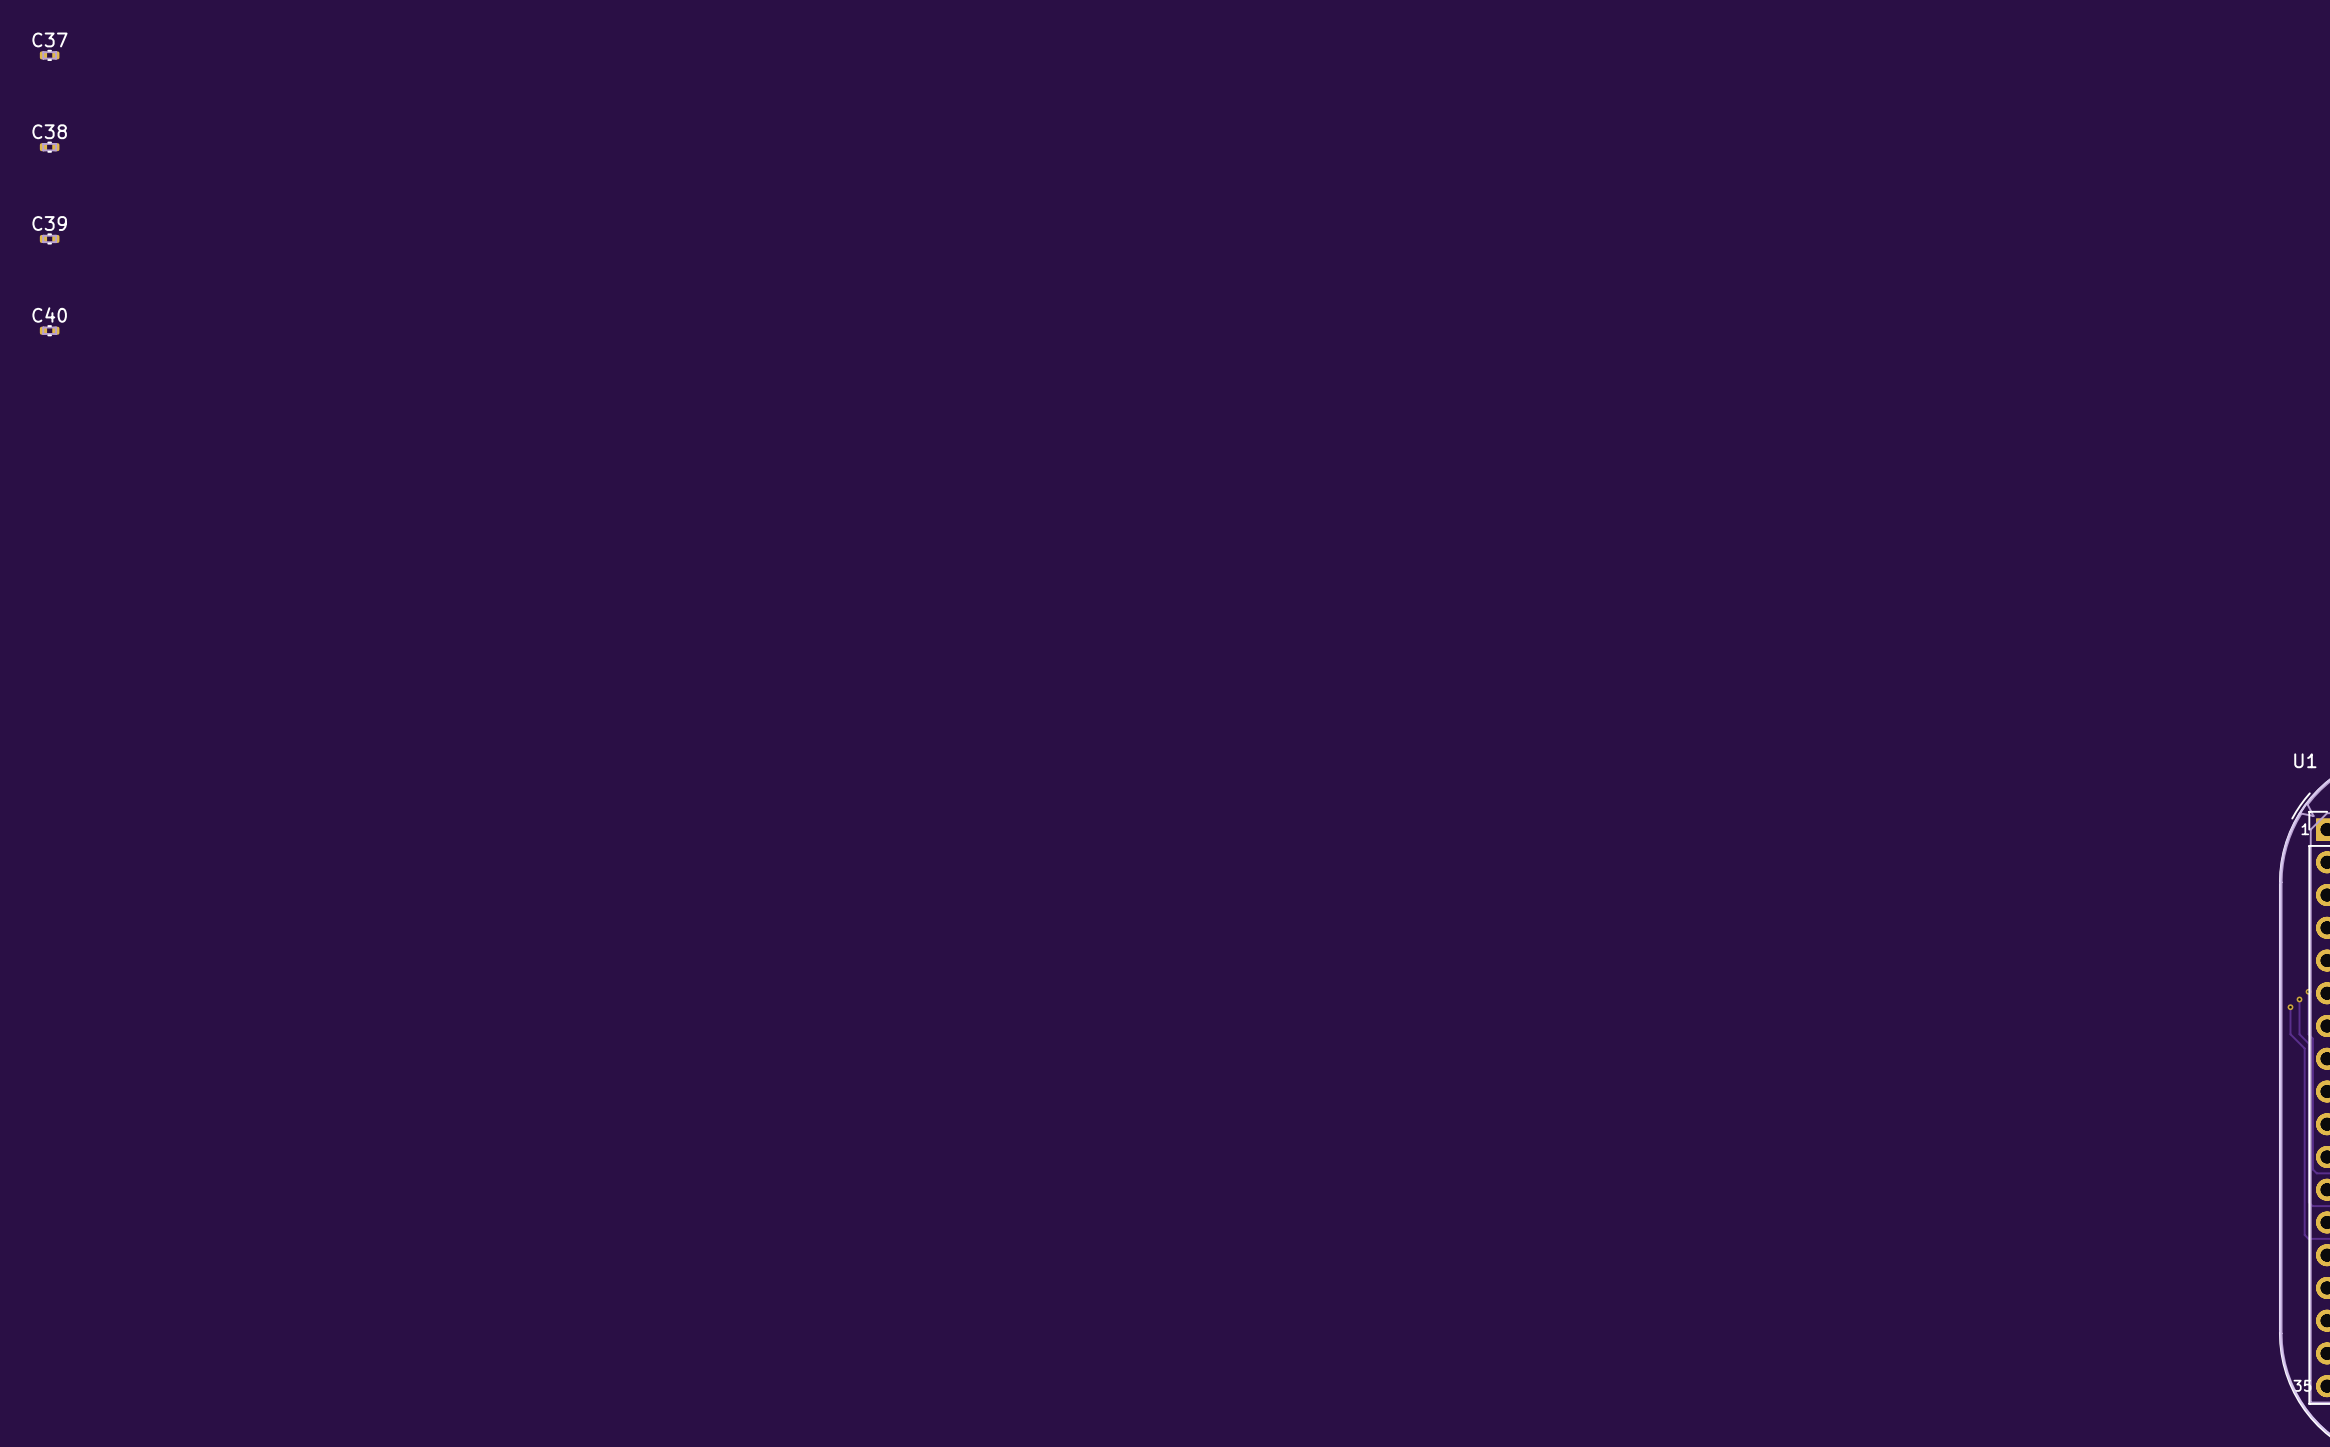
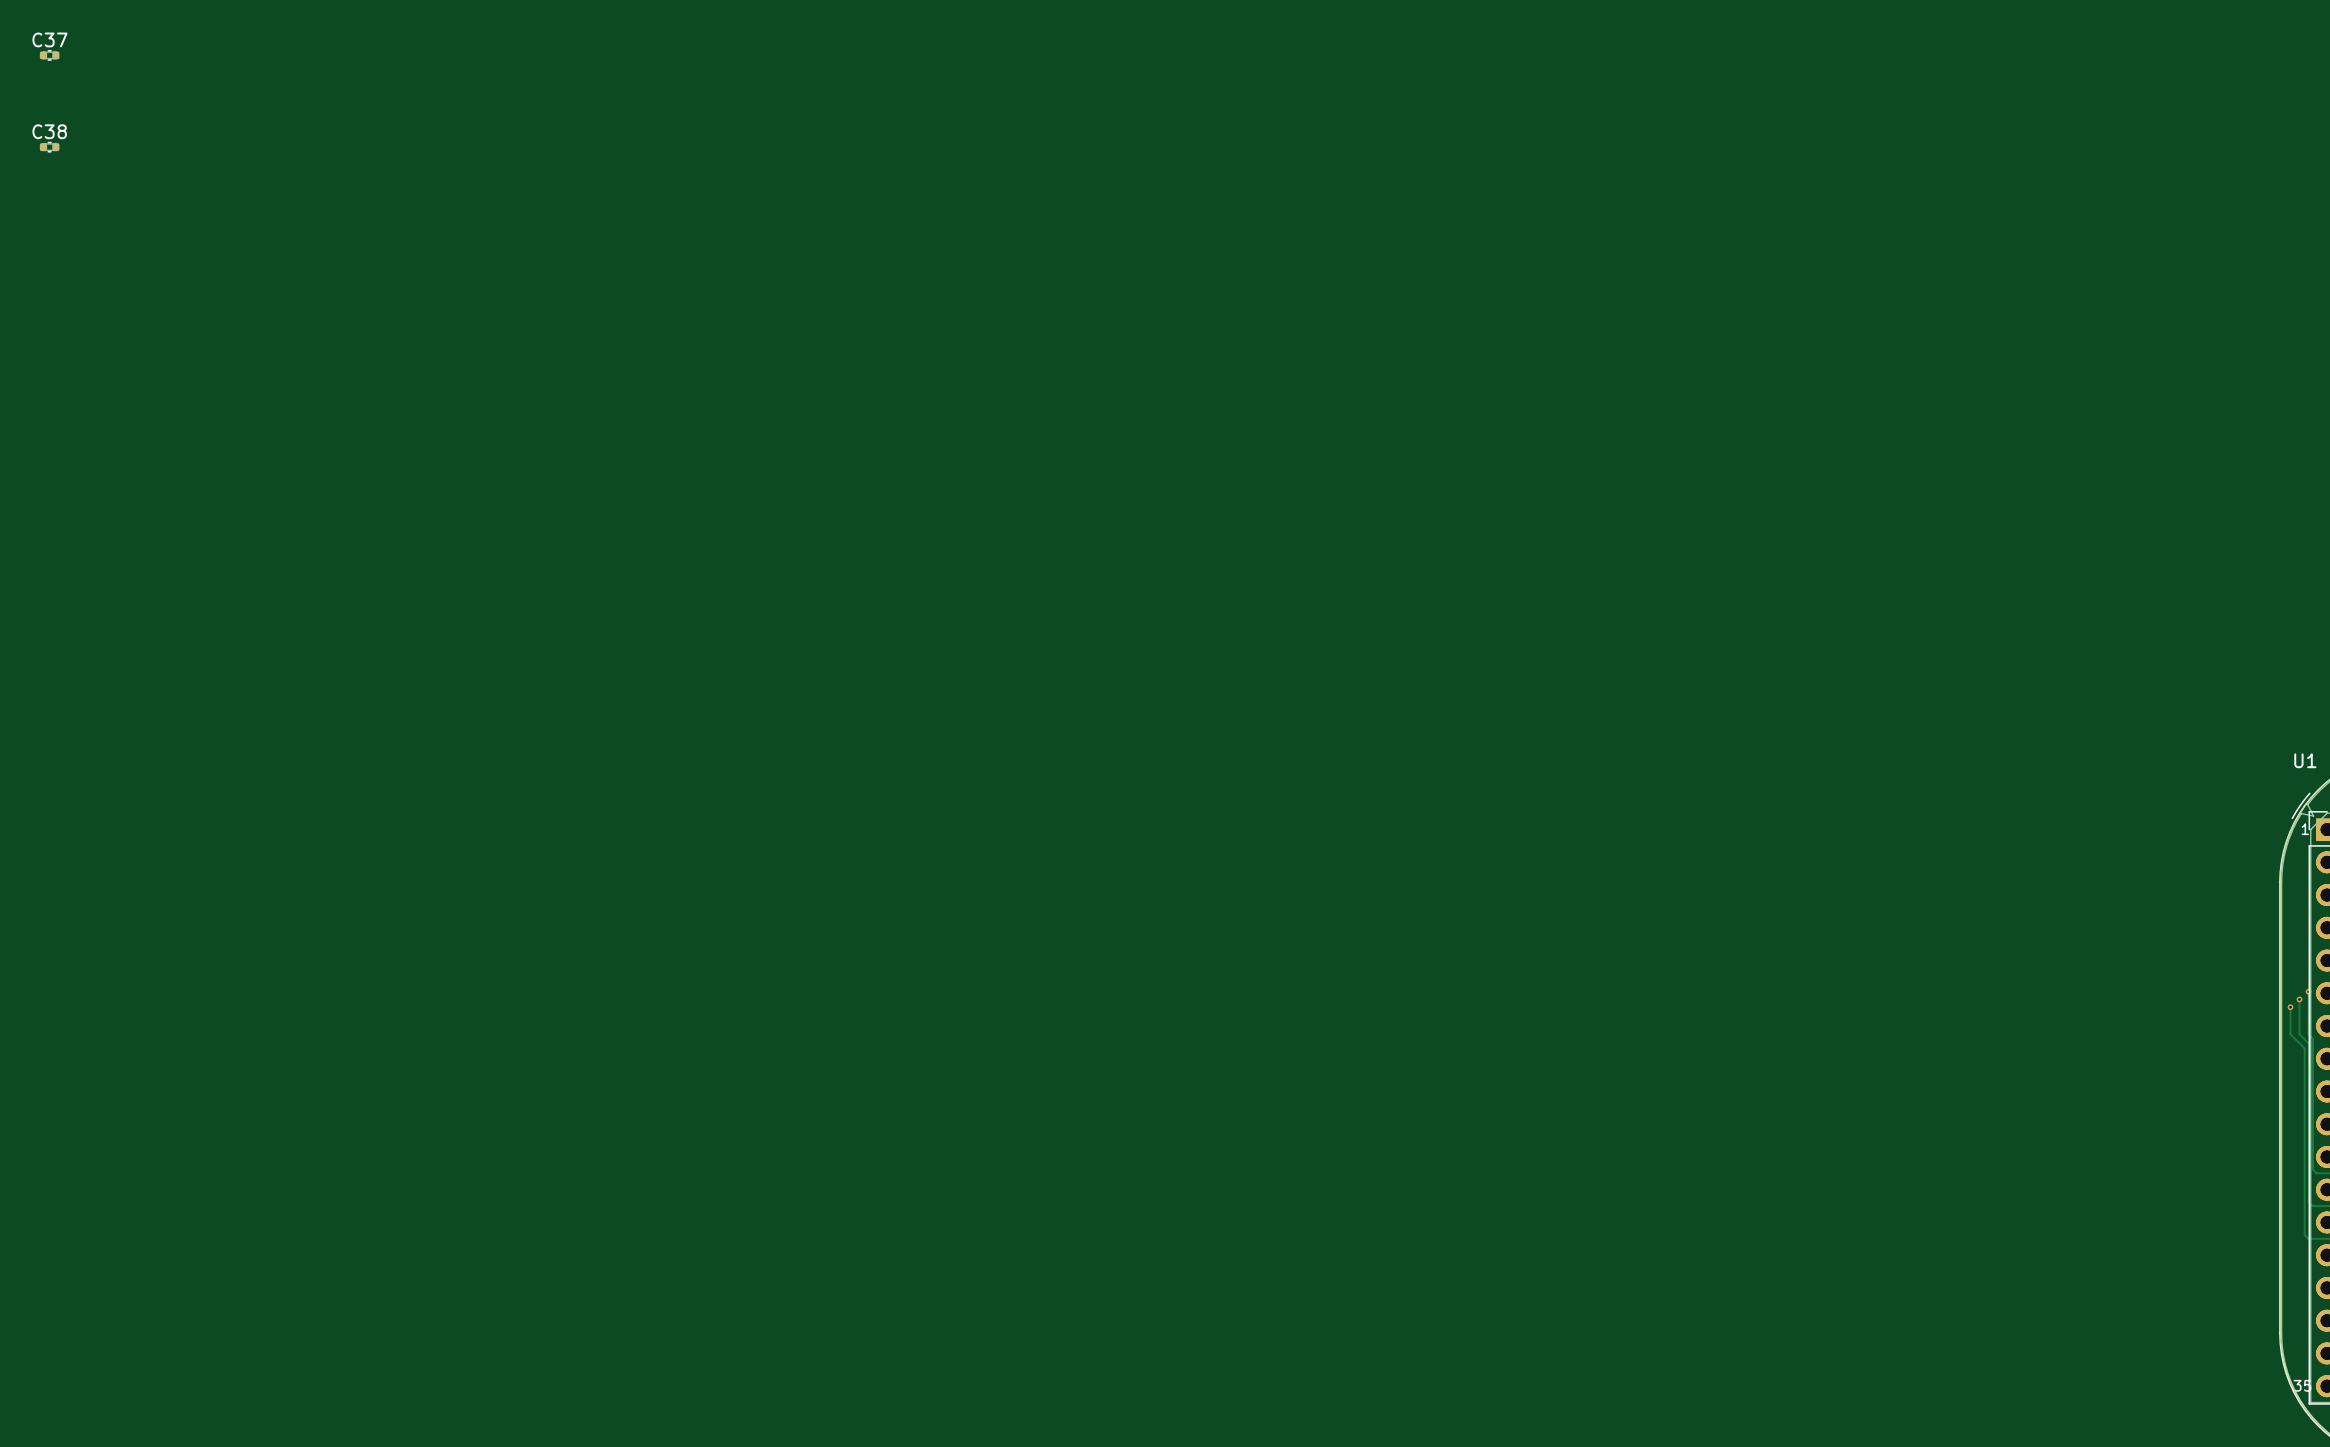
C39: (49, 238) -> none
C40: (49, 330) -> none

